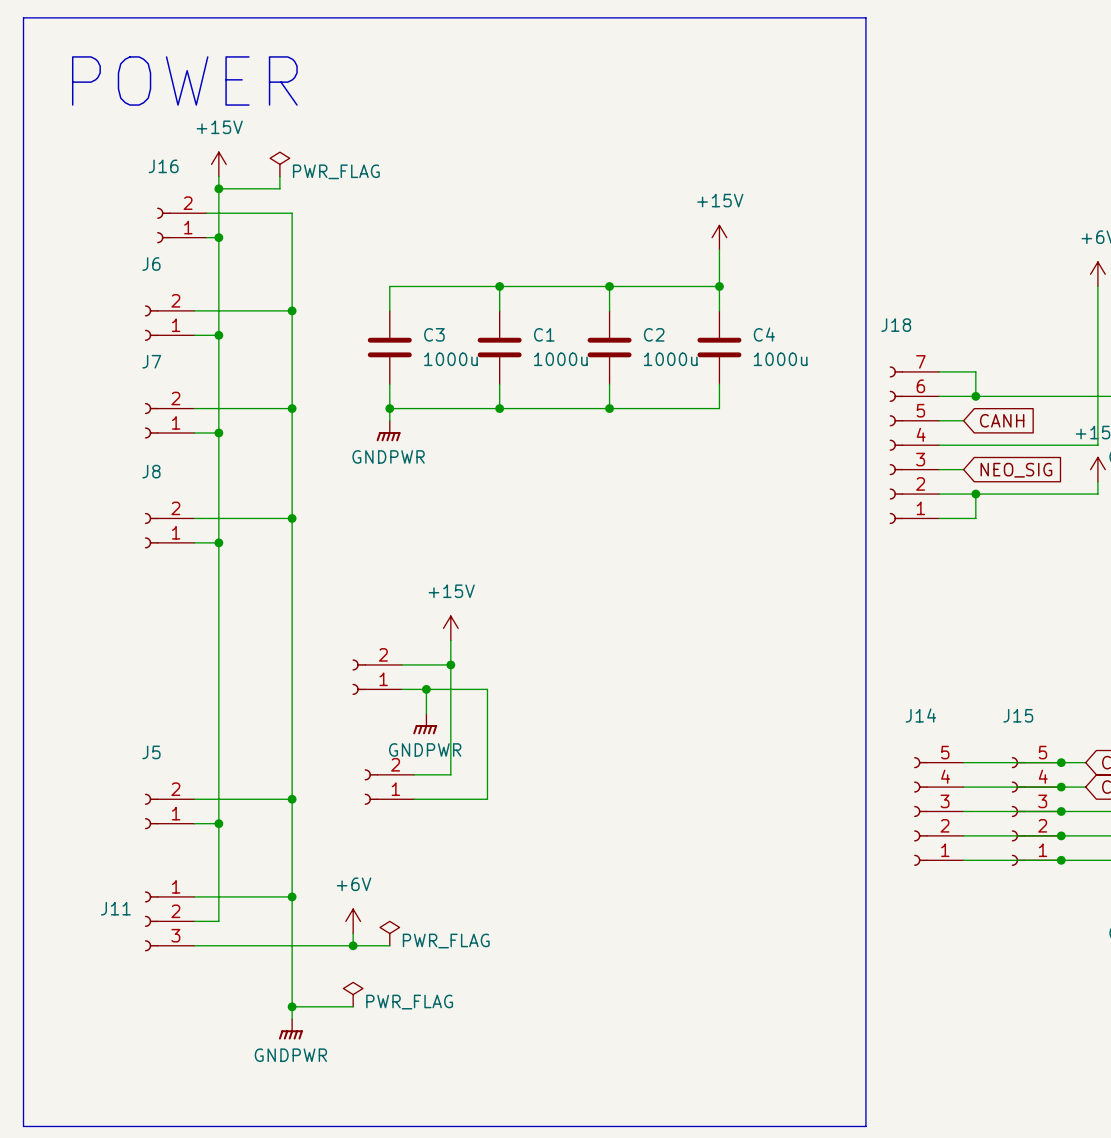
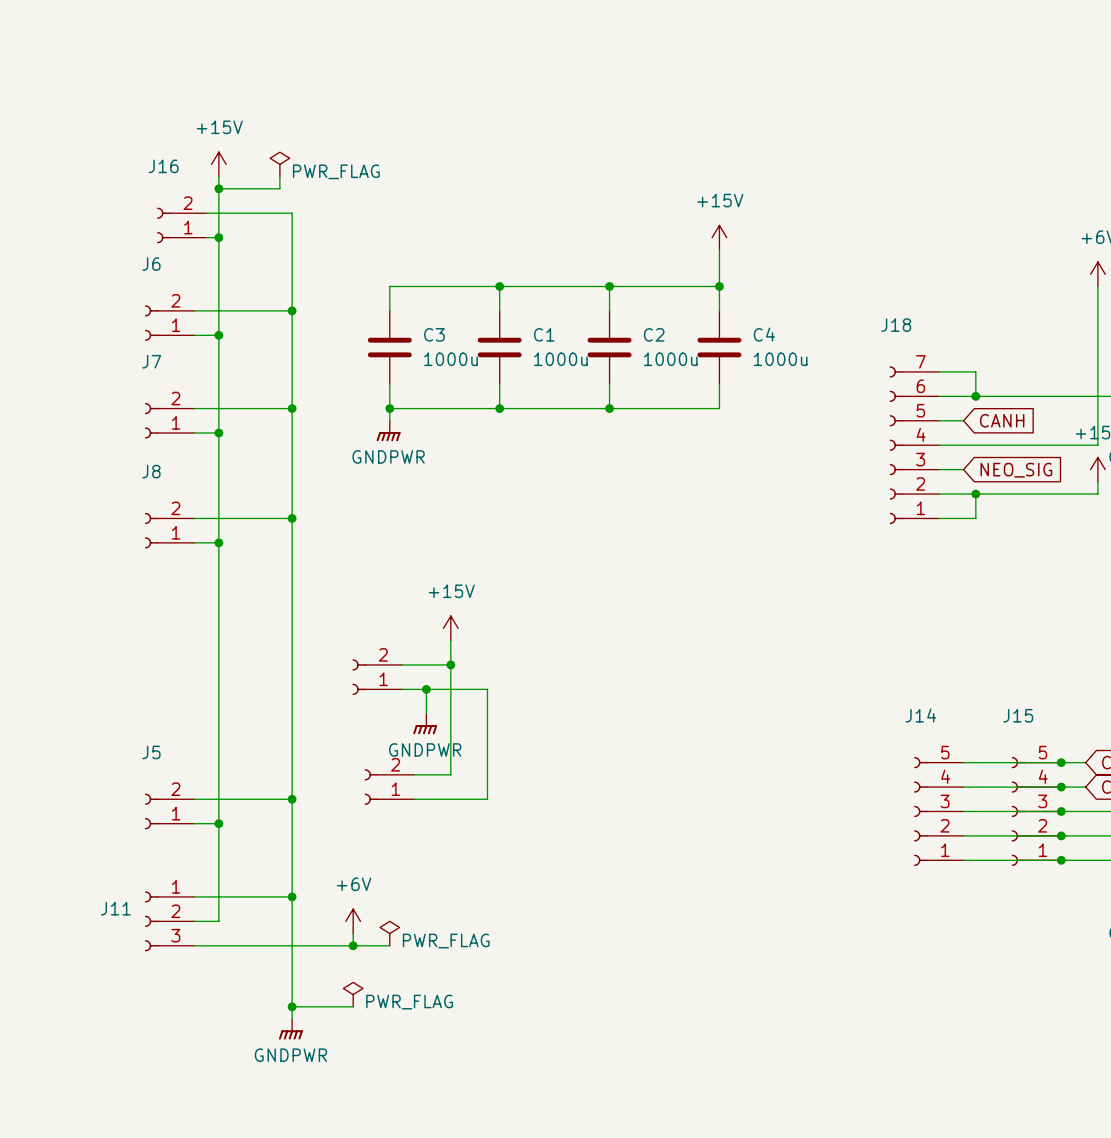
line: (23, 17) (23, 1126) (865, 1126) (865, 17) (23, 17) -> none
text: POWER (184, 80) -> none

